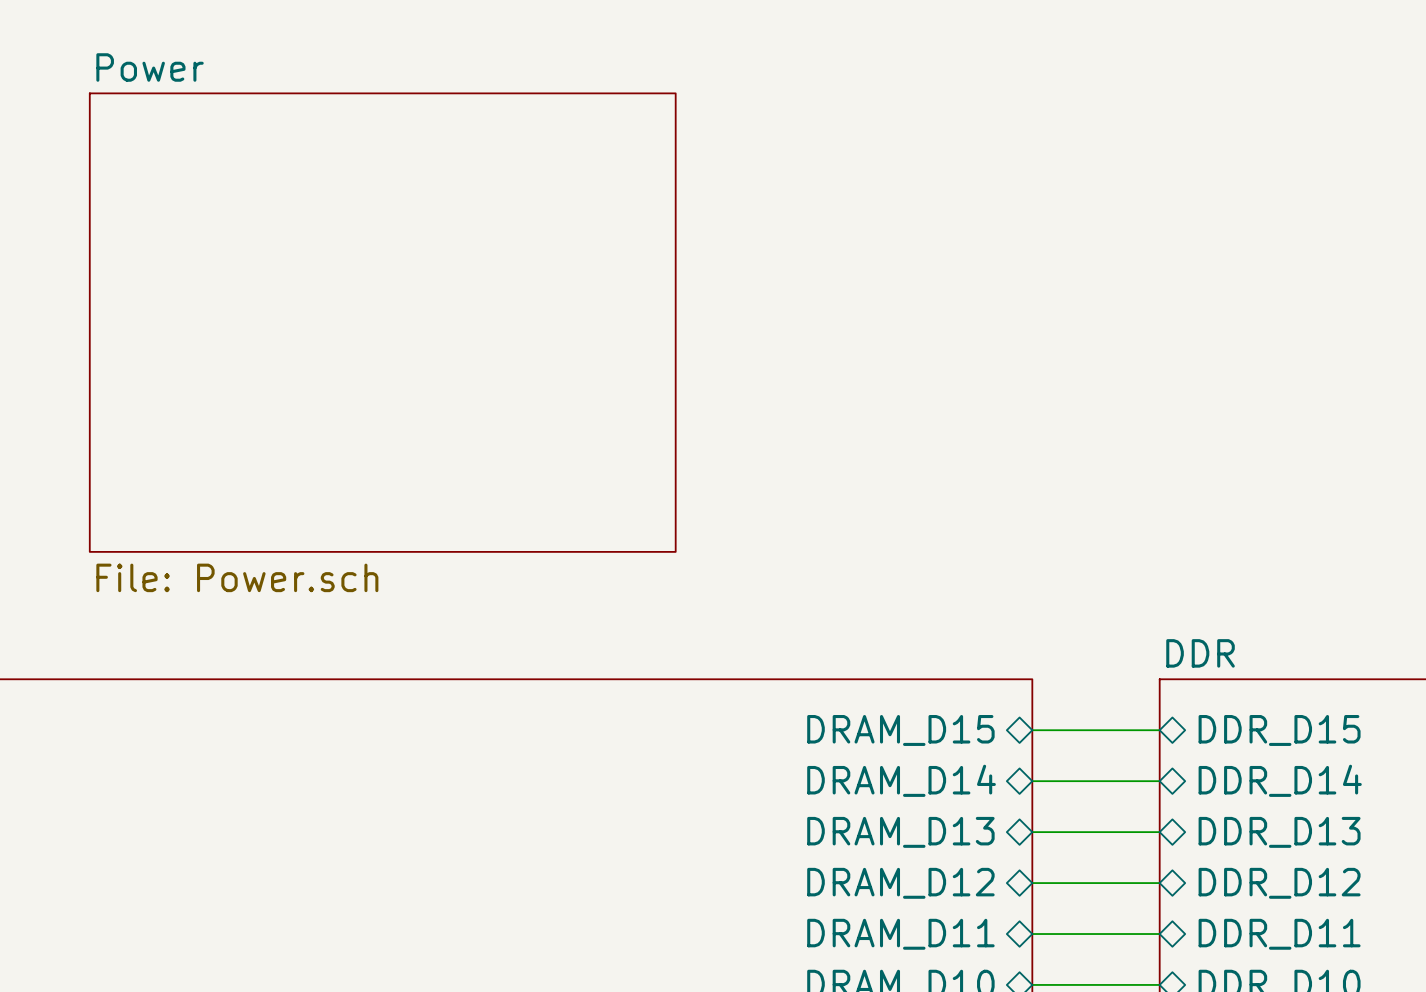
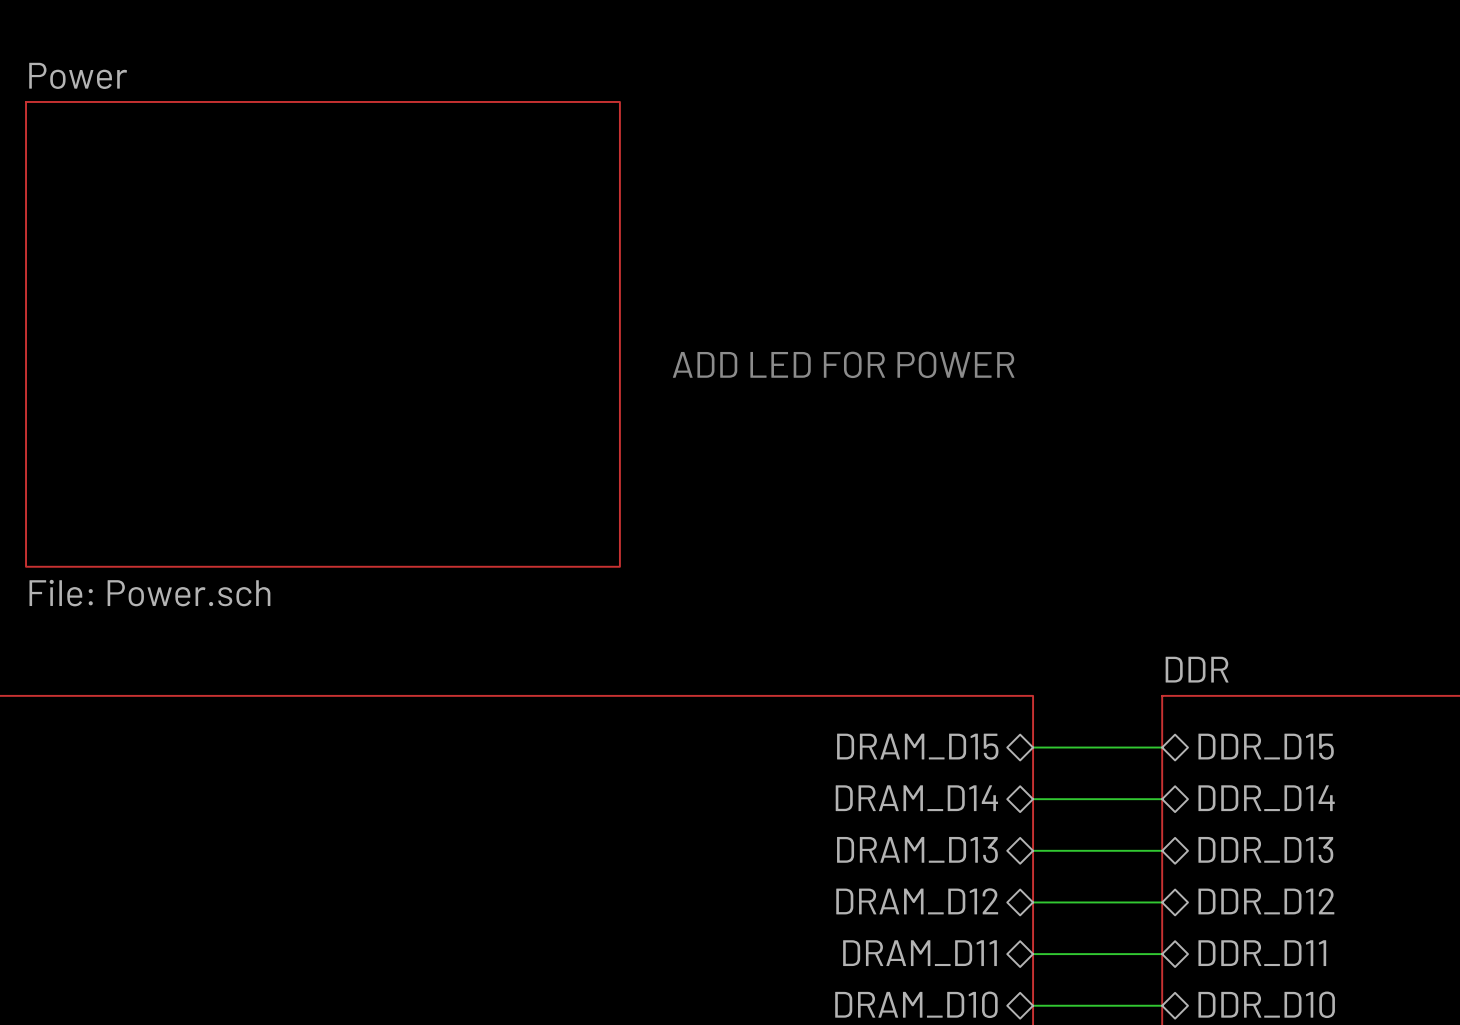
sheet Power position: (382, 322) -> (322, 334)
text: none -> ADD LED FOR POWER (843, 364)

